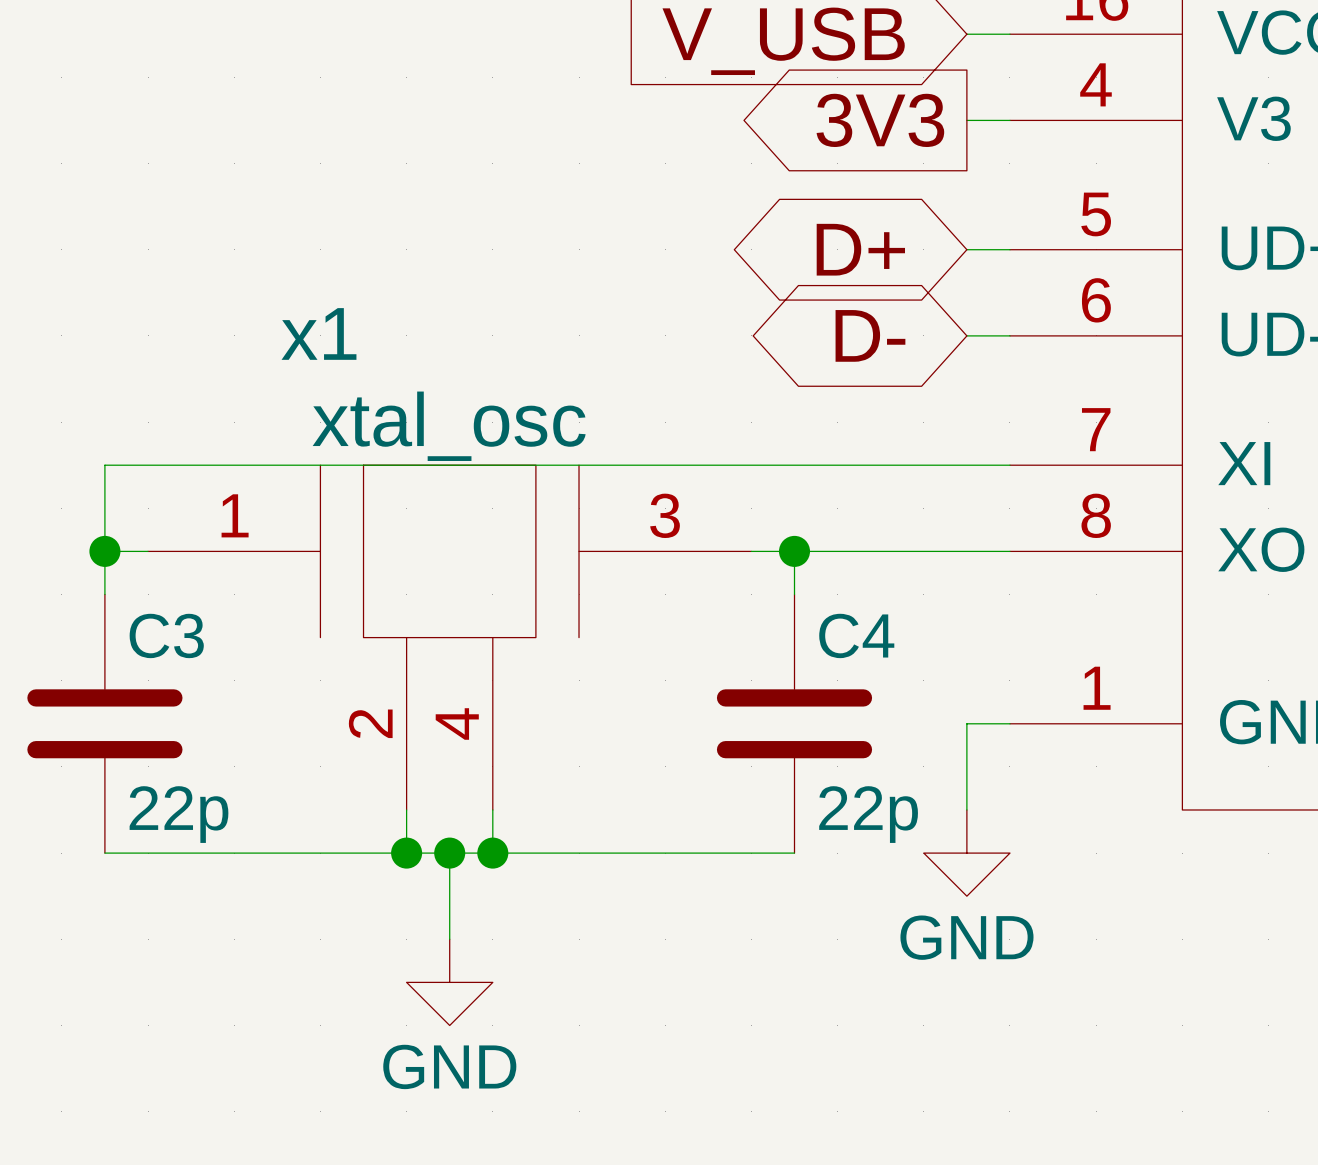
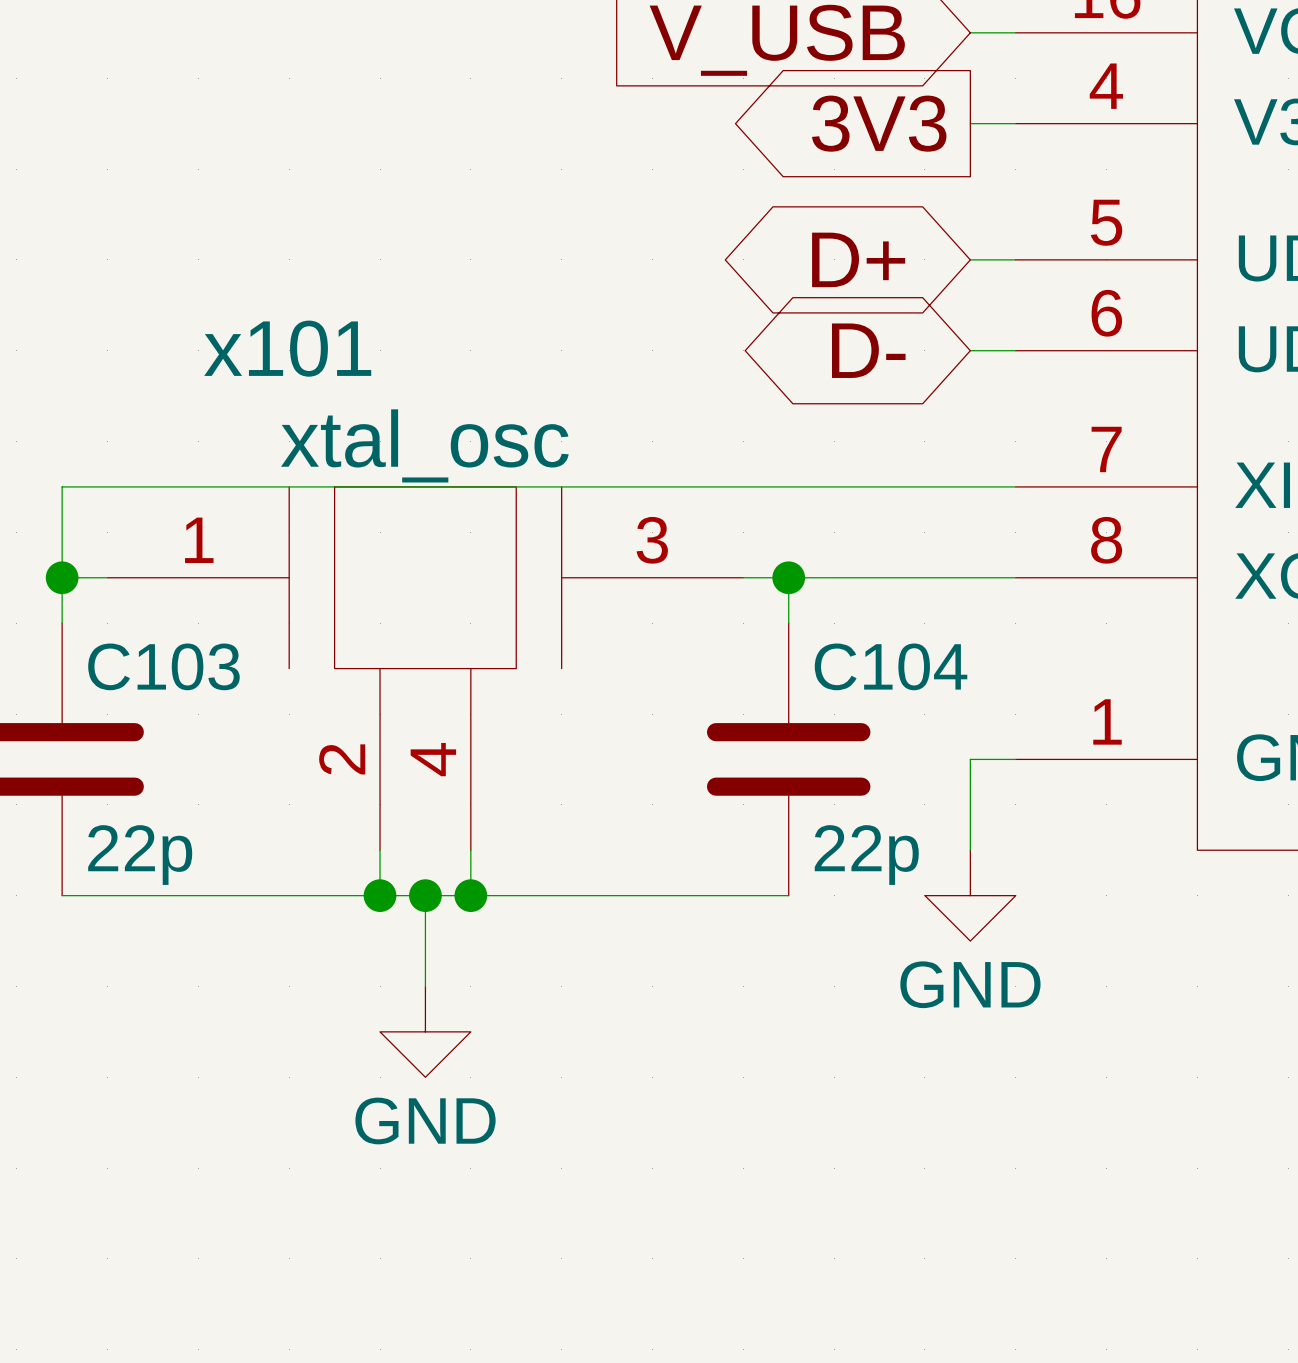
x1 name: x1 (319, 333) -> x101 (287, 348)
C3 name: C3 (166, 635) -> C103 (163, 666)
C4 name: C4 (856, 635) -> C104 (891, 666)

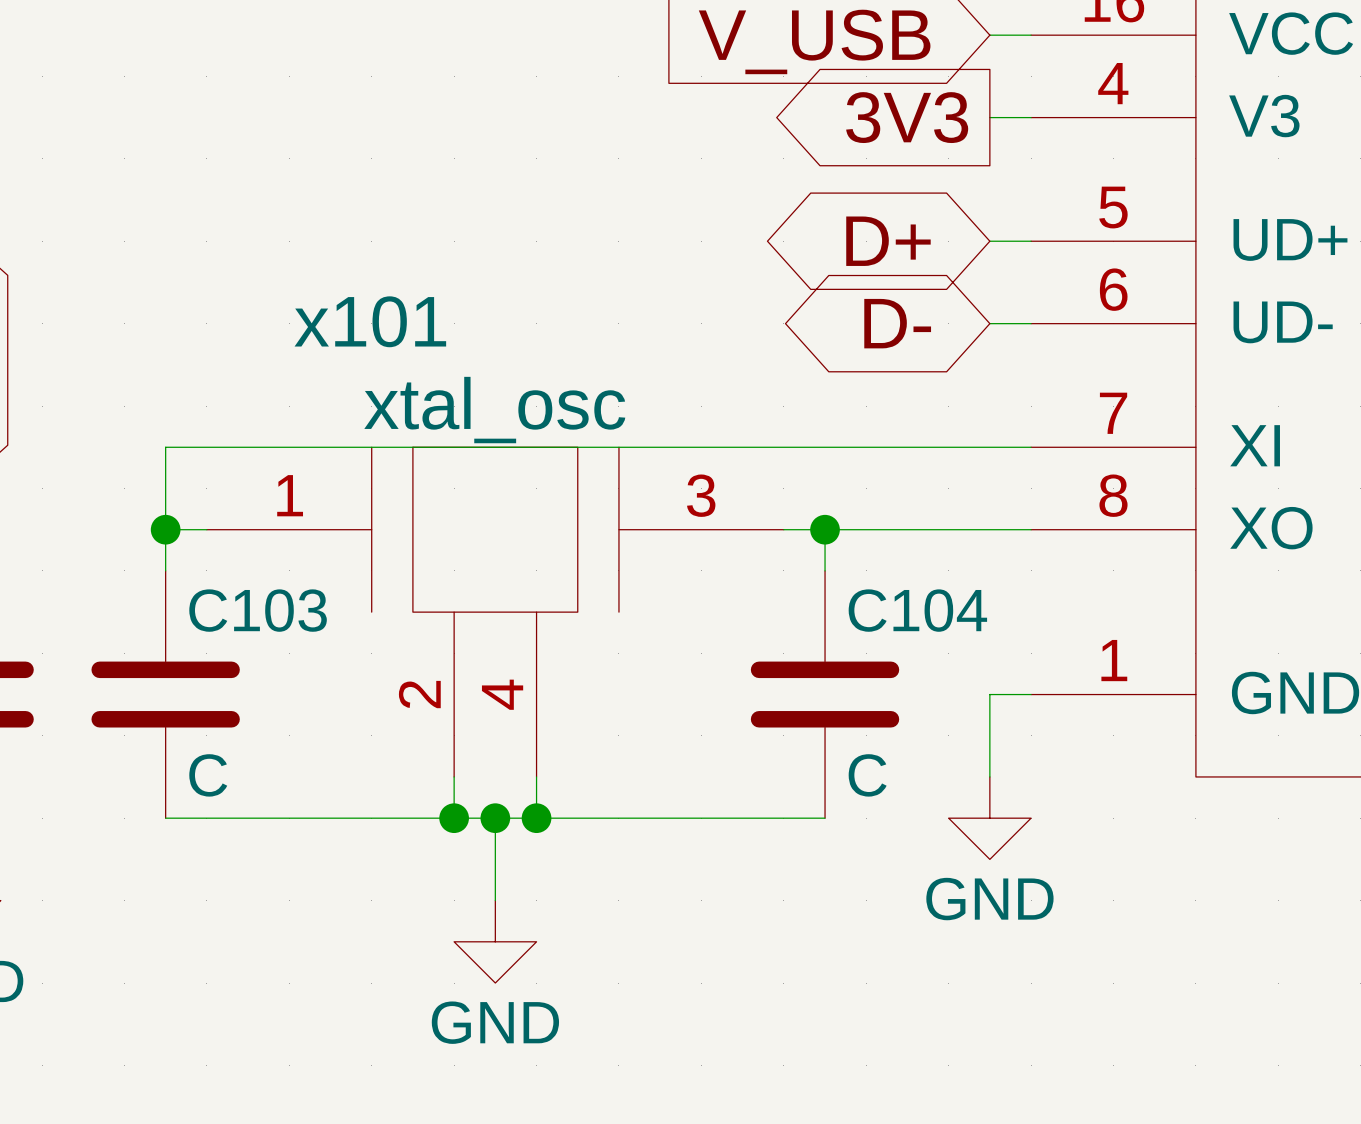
C103 value: 22p (140, 855) -> C (208, 775)
C104 value: 22p (866, 855) -> C (867, 775)

